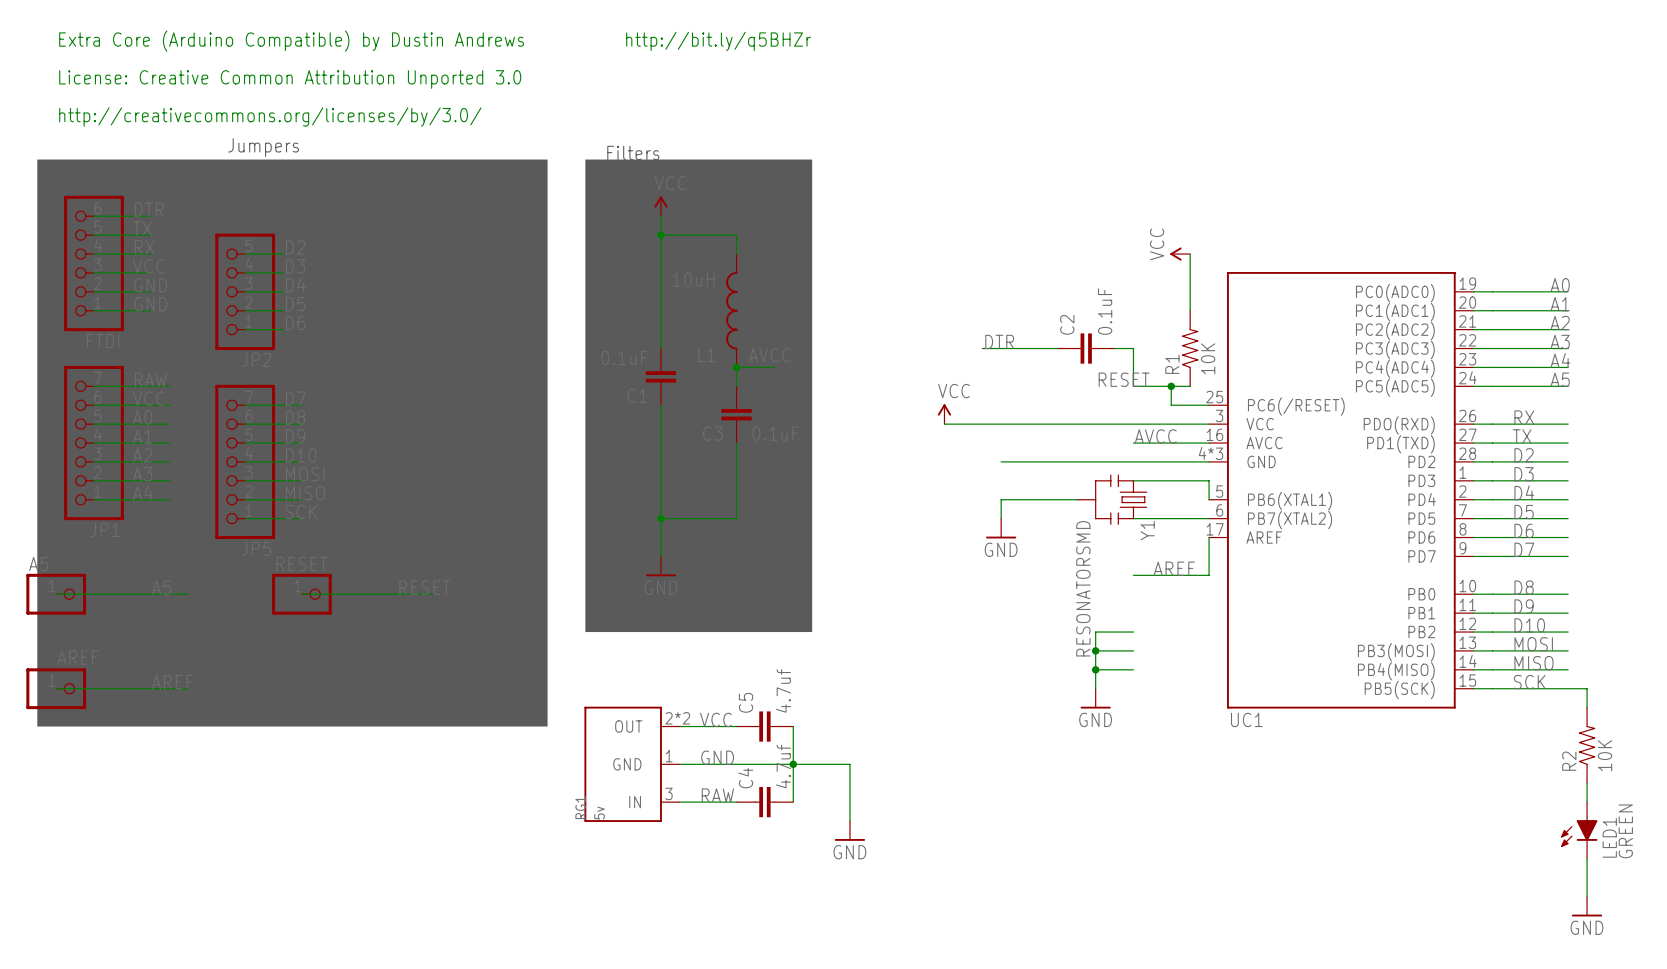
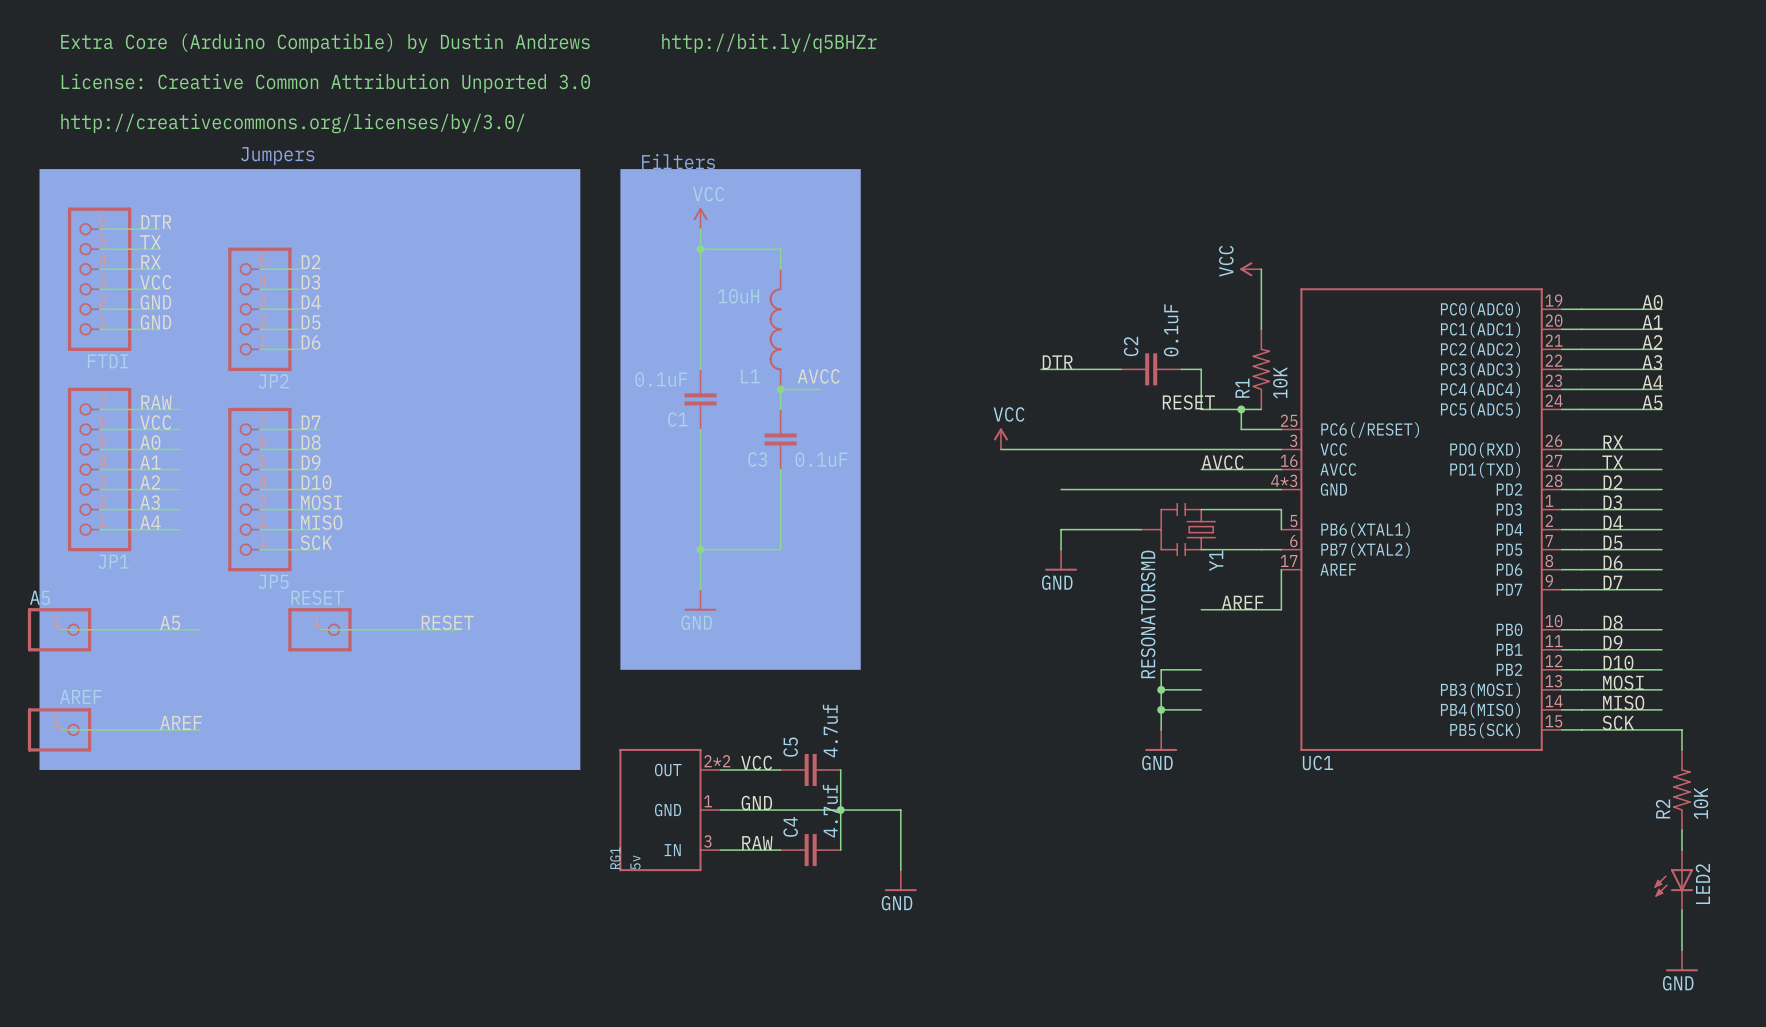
LED1: GREEN (1579, 830) -> none
LED2: none -> (1673, 880)

